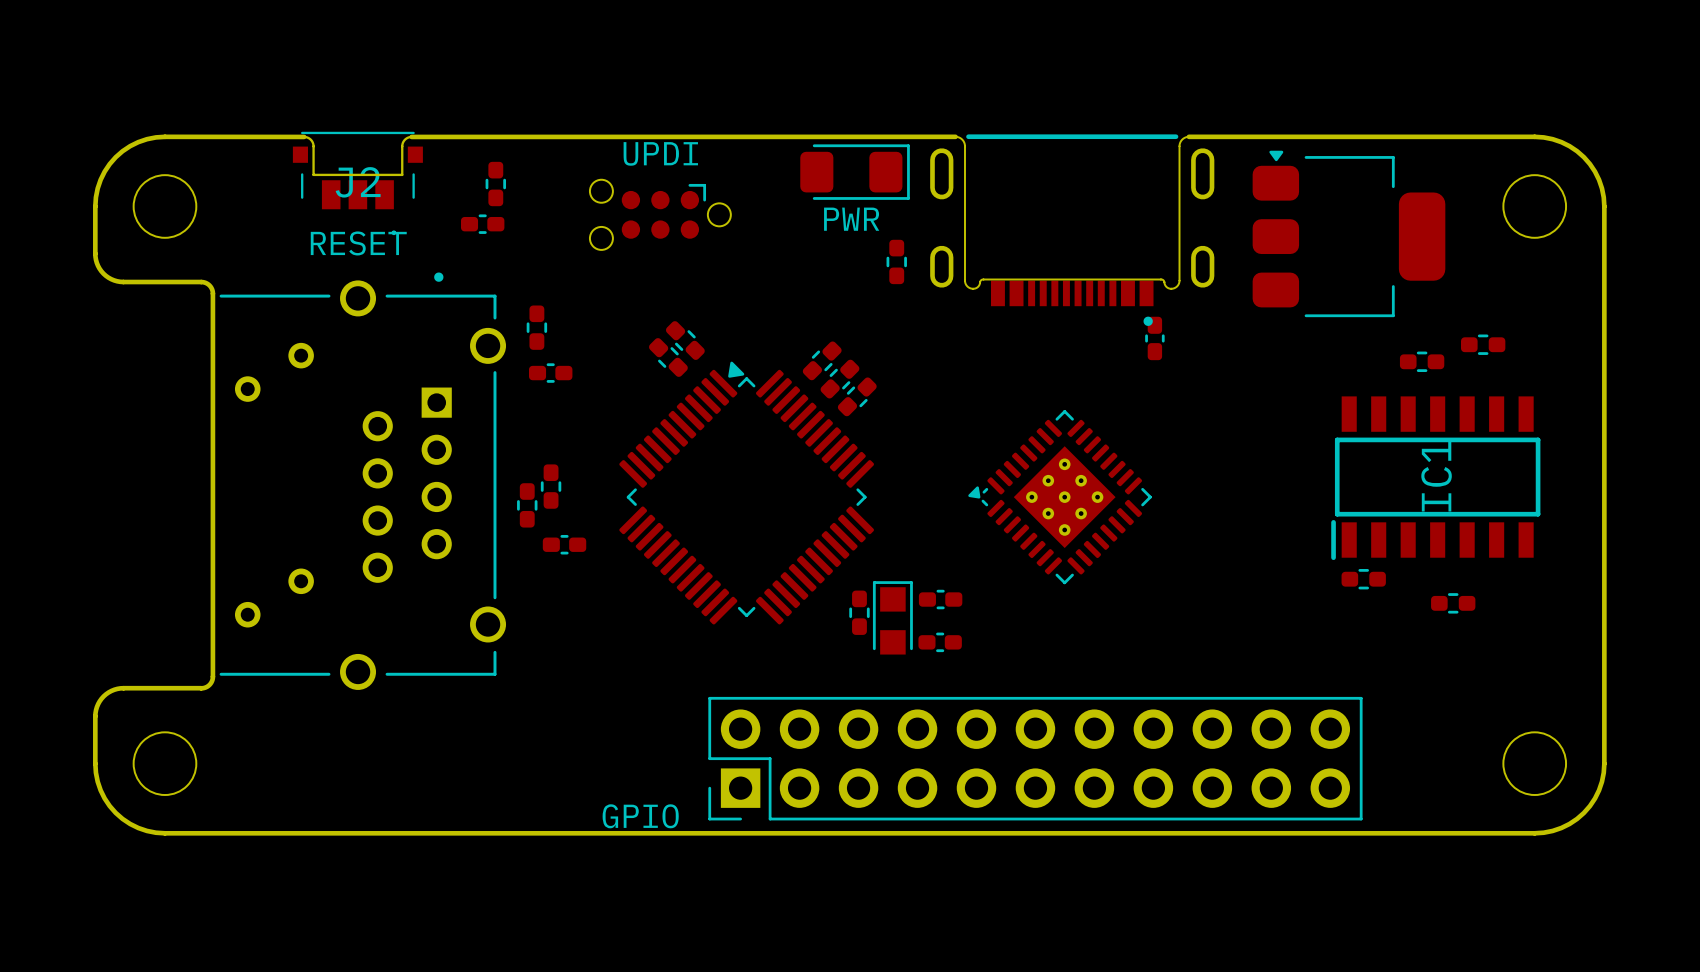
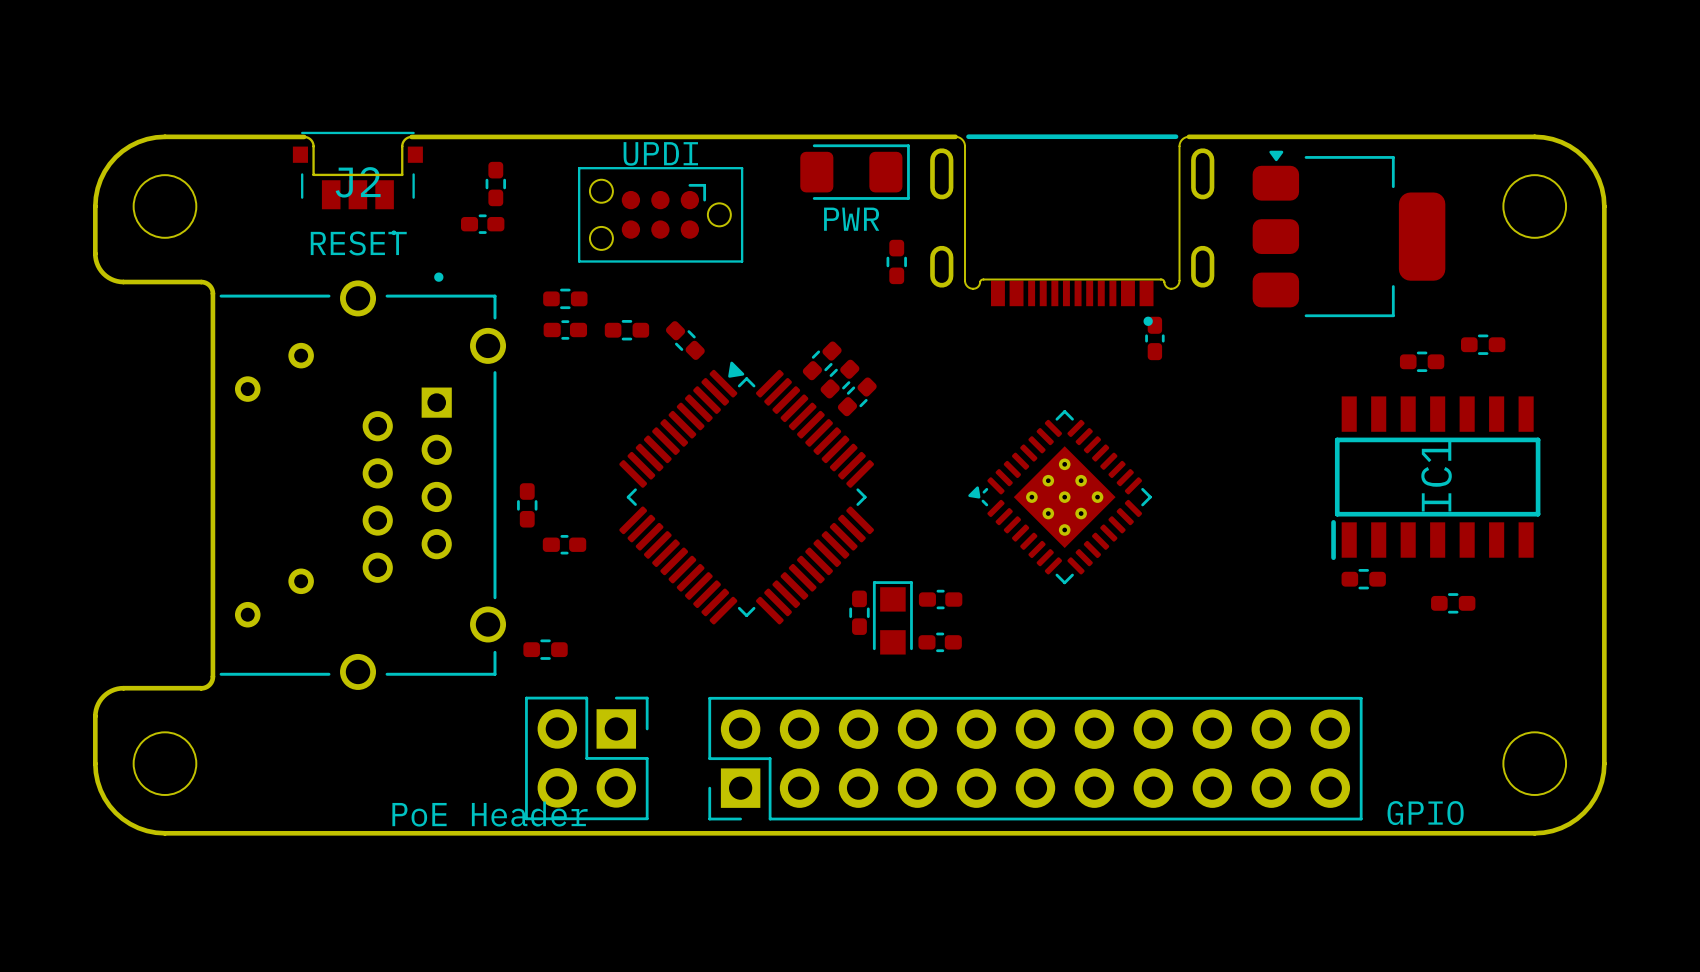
line: none -> (579, 168) (742, 168) (742, 261) (579, 261) (579, 168)
part rotation: 0° (536, 327) -> 90° clockwise (565, 298)
part position: (536, 327) -> (565, 298)
part: none -> (626, 330)
part: (668, 357) -> none
part position: (550, 373) -> (565, 329)
part: (551, 486) -> none
part: none -> (545, 649)
part: none -> PoE Header (586, 758)
part value position: GPIO (640, 816) -> GPIO (1425, 813)

